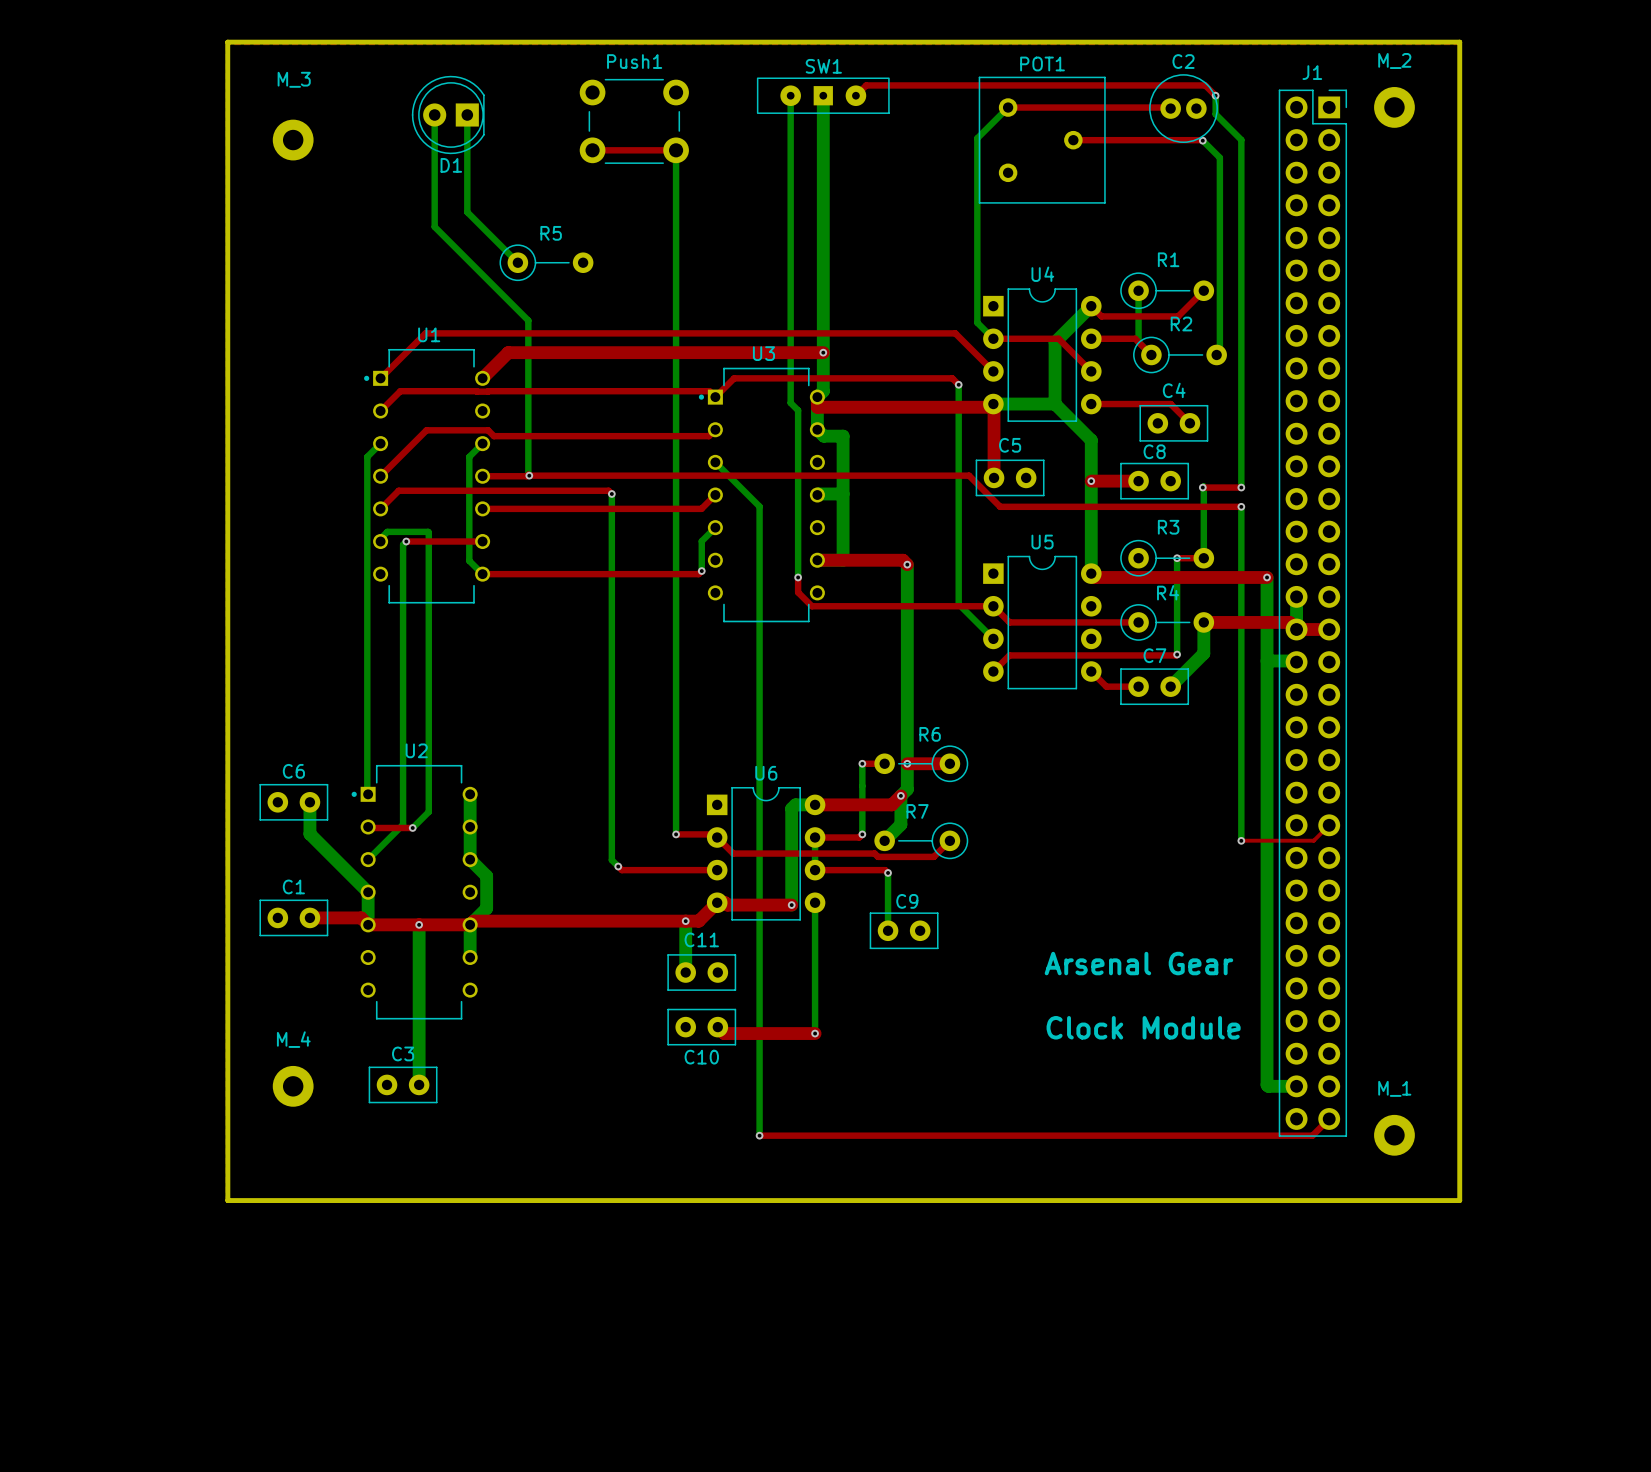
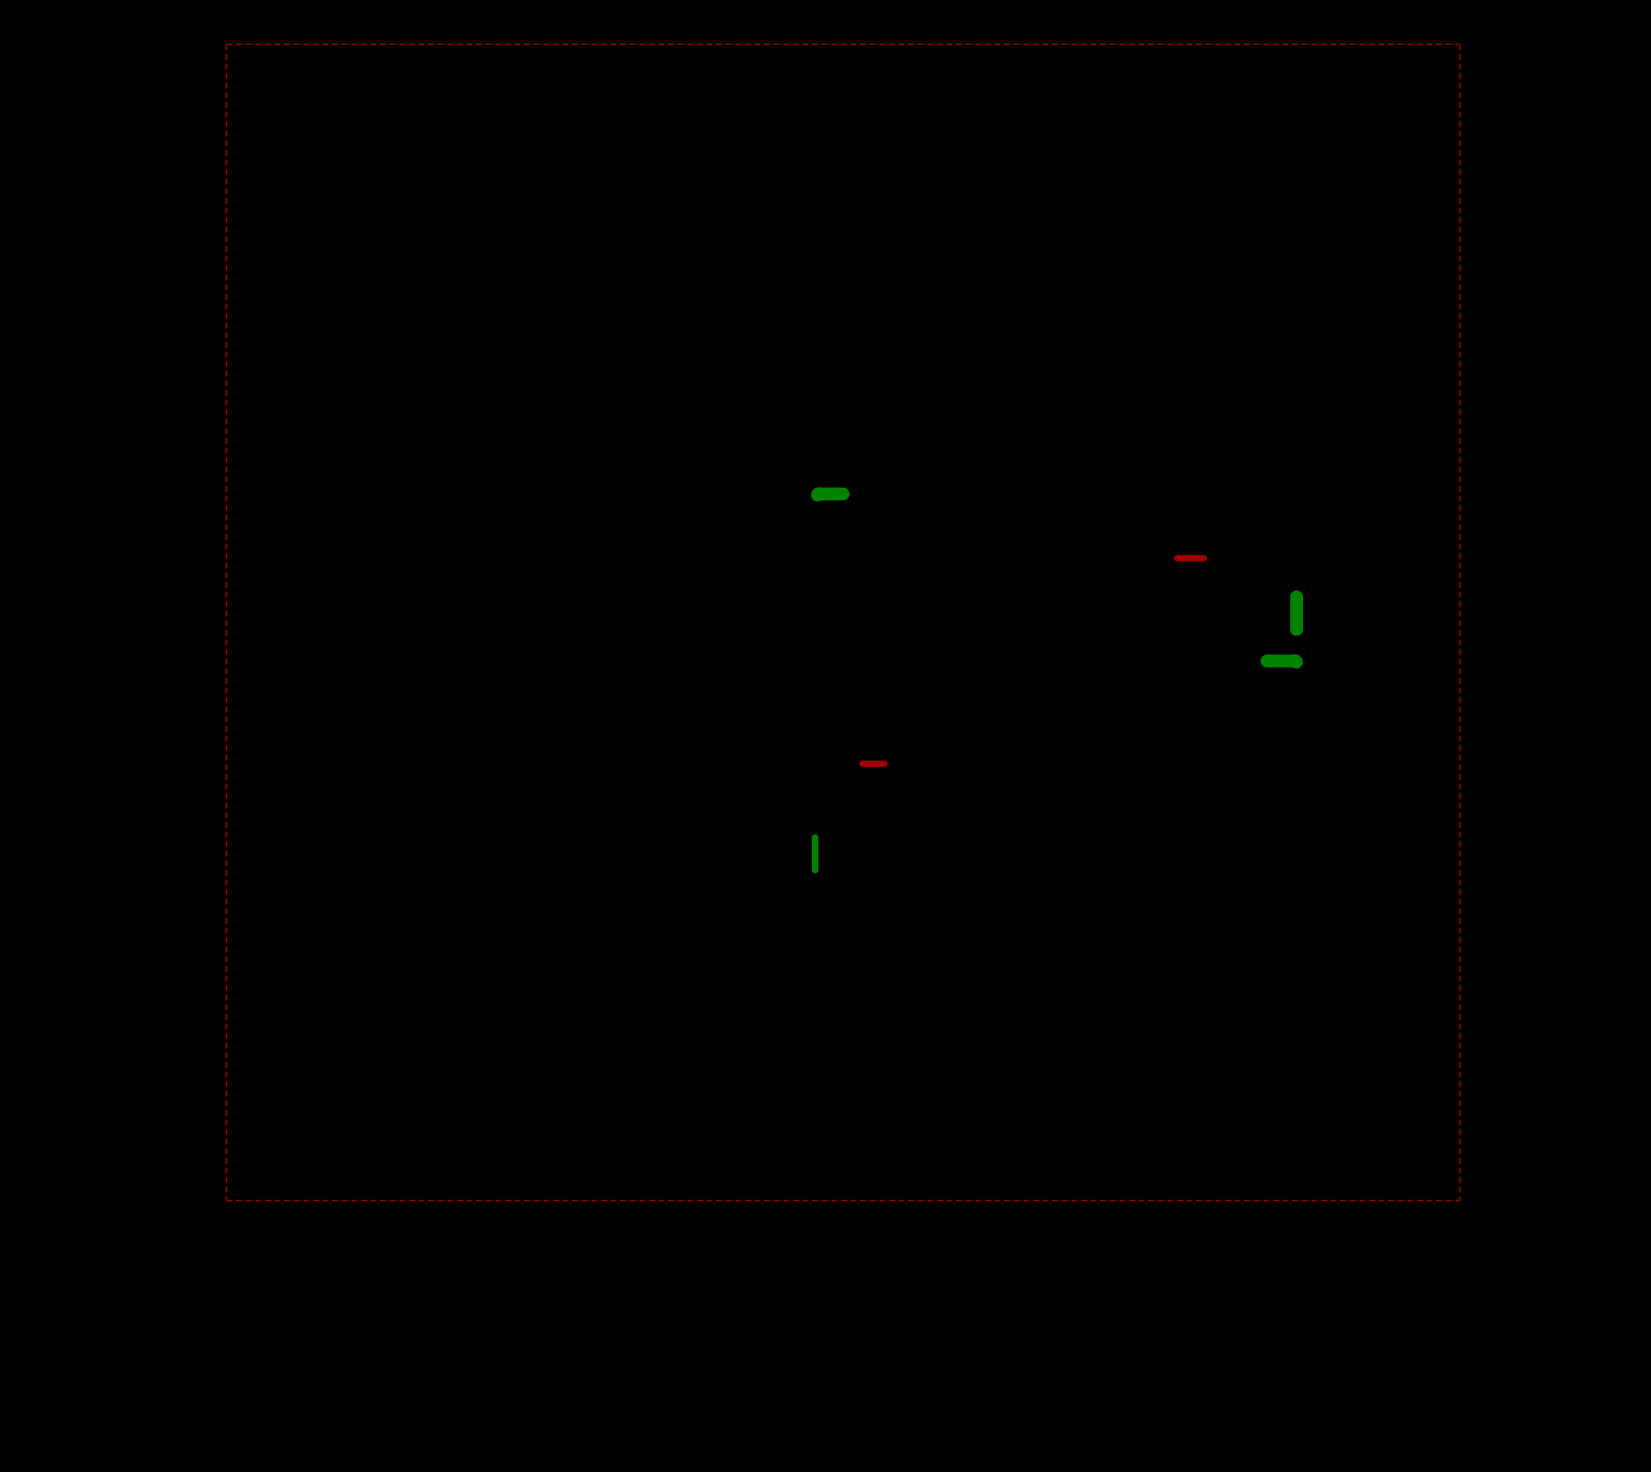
board edge: (227, 42) (1459, 42) (1459, 1200) (227, 1200) (227, 42) -> none
bottom track: (790, 95) (790, 402) (798, 410) (798, 577) -> none
bottom track: (823, 95) (823, 391) (817, 397) (817, 429) (823, 436) (843, 436) (843, 560) (817, 560) -> none
SW1: (823, 95) -> none
top track: (855, 95) (866, 85) (1205, 85) (1215, 95) -> none
bottom track: (1215, 95) (1215, 114) (1241, 139) (1241, 487) -> none
via: (1215, 95) -> none
top track: (1008, 107) (1170, 108) -> none
bottom track: (1008, 107) (977, 138) (977, 322) (993, 338) -> none
M_2: (1394, 107) -> none
C2: (1183, 108) -> none
bottom track: (434, 114) (434, 226) (528, 320) (529, 475) -> none
D1: (448, 114) -> none
bottom track: (467, 114) (467, 212) (517, 262) -> none
Push1: (634, 121) -> none
M_3: (293, 140) -> none
POT1: (1042, 140) -> none
top track: (1073, 140) (1202, 140) -> none
bottom track: (1202, 140) (1219, 157) (1219, 351) (1216, 354) -> none
via: (1202, 140) -> none
top track: (592, 150) (676, 150) -> none
bottom track: (676, 150) (676, 834) -> none
R5: (546, 262) -> none
bottom track: (1138, 290) (1138, 342) (1151, 354) -> none
R1: (1167, 290) -> none
top track: (1203, 290) (1178, 316) (1101, 316) (1091, 306) -> none
bottom track: (1091, 306) (1055, 342) (1055, 404) -> none
top track: (993, 338) (1058, 338) (1091, 371) -> none
top track: (1091, 338) (1135, 338) (1151, 354) -> none
top track: (823, 352) (508, 352) (482, 378) -> none
via: (823, 352) -> none
R2: (1179, 354) -> none
U4: (1042, 355) -> none
top track: (993, 371) (955, 333) (425, 333) (380, 378) -> none
top track: (958, 384) (952, 378) (734, 378) (715, 397) (709, 391) (400, 391) (380, 410) -> none
bottom track: (958, 384) (958, 604) (993, 638) -> none
via: (958, 384) -> none
top track: (817, 397) (817, 407) (990, 407) (993, 404) (994, 477) -> none
bottom track: (993, 404) (1055, 404) -> none
bottom track: (1055, 404) (1091, 440) (1091, 573) -> none
top track: (1091, 404) (1170, 404) (1189, 423) -> none
C4: (1173, 423) -> none
top track: (715, 429) (708, 436) (493, 436) (488, 430) (426, 430) (380, 476) -> none
bottom track: (380, 443) (367, 456) (368, 794) -> none
bottom track: (482, 443) (469, 456) (469, 560) (482, 574) -> none
bottom track: (715, 462) (759, 506) (759, 1135) -> none
via: (529, 475) -> none
U1: (427, 476) -> none
top track: (482, 476) (969, 475) (1000, 506) (1241, 506) -> none
C5: (1010, 477) -> none
top track: (1091, 481) (1138, 481) -> none
via: (1091, 481) -> none
C8: (1154, 481) -> none
top track: (1202, 487) (1241, 487) -> none
bottom track: (1202, 487) (1203, 558) -> none
via: (1202, 487) -> none
via: (1241, 487) -> none
top track: (611, 493) (608, 490) (398, 490) (380, 508) -> none
bottom track: (611, 493) (611, 860) (618, 866) -> none
via: (611, 493) -> none
top track: (715, 495) (701, 508) (482, 508) -> none
U3: (761, 495) -> none
bottom track: (1241, 506) (1241, 840) -> none
via: (1241, 506) -> none
bottom track: (715, 527) (701, 541) (701, 571) -> none
bottom track: (380, 541) (380, 538) (387, 531) (428, 532) (428, 811) (412, 827) -> none
top track: (406, 541) (482, 541) -> none
bottom track: (406, 541) (403, 544) (403, 824) (368, 859) -> none
via: (406, 541) -> none
R3: (1167, 558) -> none
bottom track: (1177, 558) (1177, 654) -> none
via: (1177, 558) -> none
top track: (817, 560) (902, 560) (907, 564) -> none
bottom track: (907, 564) (907, 789) (900, 795) (900, 824) (884, 840) -> none
via: (907, 564) -> none
top track: (701, 571) (698, 574) (482, 574) -> none
via: (701, 571) -> none
top track: (1091, 573) (1095, 577) (1267, 577) -> none
top track: (798, 577) (798, 592) (811, 606) (993, 606) (1009, 622) (1138, 622) -> none
via: (798, 577) -> none
bottom track: (1267, 577) (1267, 1084) (1296, 1086) -> none
via: (1267, 577) -> none
J1: (1312, 613) -> none
U5: (1042, 622) -> none
R4: (1167, 622) -> none
top track: (1203, 622) (1289, 622) (1296, 629) (1329, 629) -> none
bottom track: (1203, 622) (1203, 653) (1170, 686) (1170, 680) -> none
top track: (1177, 654) (1009, 655) (993, 671) -> none
via: (1177, 654) -> none
top track: (1091, 671) (1106, 686) (1138, 686) -> none
C7: (1154, 686) -> none
bottom track: (862, 763) (862, 834) -> none
via: (862, 763) -> none
top track: (907, 763) (949, 763) -> none
via: (907, 763) -> none
R6: (921, 763) -> none
bottom track: (470, 794) (470, 859) (486, 876) (486, 908) (470, 924) (470, 957) -> none
top track: (900, 795) (891, 804) (815, 804) -> none
via: (900, 795) -> none
C6: (293, 802) -> none
bottom track: (309, 802) (309, 834) (368, 892) (368, 924) -> none
bottom track: (815, 804) (795, 804) (791, 808) (791, 905) -> none
top track: (1329, 825) (1313, 840) (1241, 840) -> none
top track: (368, 826) (412, 827) -> none
via: (412, 827) -> none
top track: (676, 834) (714, 834) (733, 853) (874, 853) (877, 856) (933, 856) (949, 840) -> none
via: (676, 834) -> none
top track: (862, 834) (859, 837) (815, 837) -> none
via: (862, 834) -> none
R7: (921, 840) -> none
via: (1241, 840) -> none
U6: (766, 853) -> none
top track: (618, 866) (621, 870) (717, 870) -> none
via: (618, 866) -> none
top track: (815, 870) (885, 870) (888, 872) -> none
bottom track: (888, 872) (888, 930) -> none
via: (888, 872) -> none
U2: (414, 892) -> none
bottom track: (815, 902) (815, 1033) -> none
top track: (791, 905) (727, 905) (725, 902) (717, 902) (698, 921) (473, 921) (470, 924) (368, 924) (361, 917) (309, 917) -> none
via: (791, 905) -> none
C1: (293, 917) -> none
bottom track: (685, 921) (685, 972) -> none
via: (685, 921) -> none
bottom track: (419, 924) (419, 1084) -> none
via: (419, 924) -> none
C9: (904, 930) -> none
text: Arsenal Gear (1138, 963) -> none
C11: (701, 972) -> none
C10: (701, 1027) -> none
top track: (717, 1027) (724, 1033) (815, 1033) -> none
text: Clock Module (1143, 1027) -> none
via: (815, 1033) -> none
C3: (403, 1084) -> none
M_4: (293, 1086) -> none
top track: (1329, 1118) (1312, 1135) (759, 1135) -> none
via: (759, 1135) -> none
M_1: (1394, 1135) -> none

